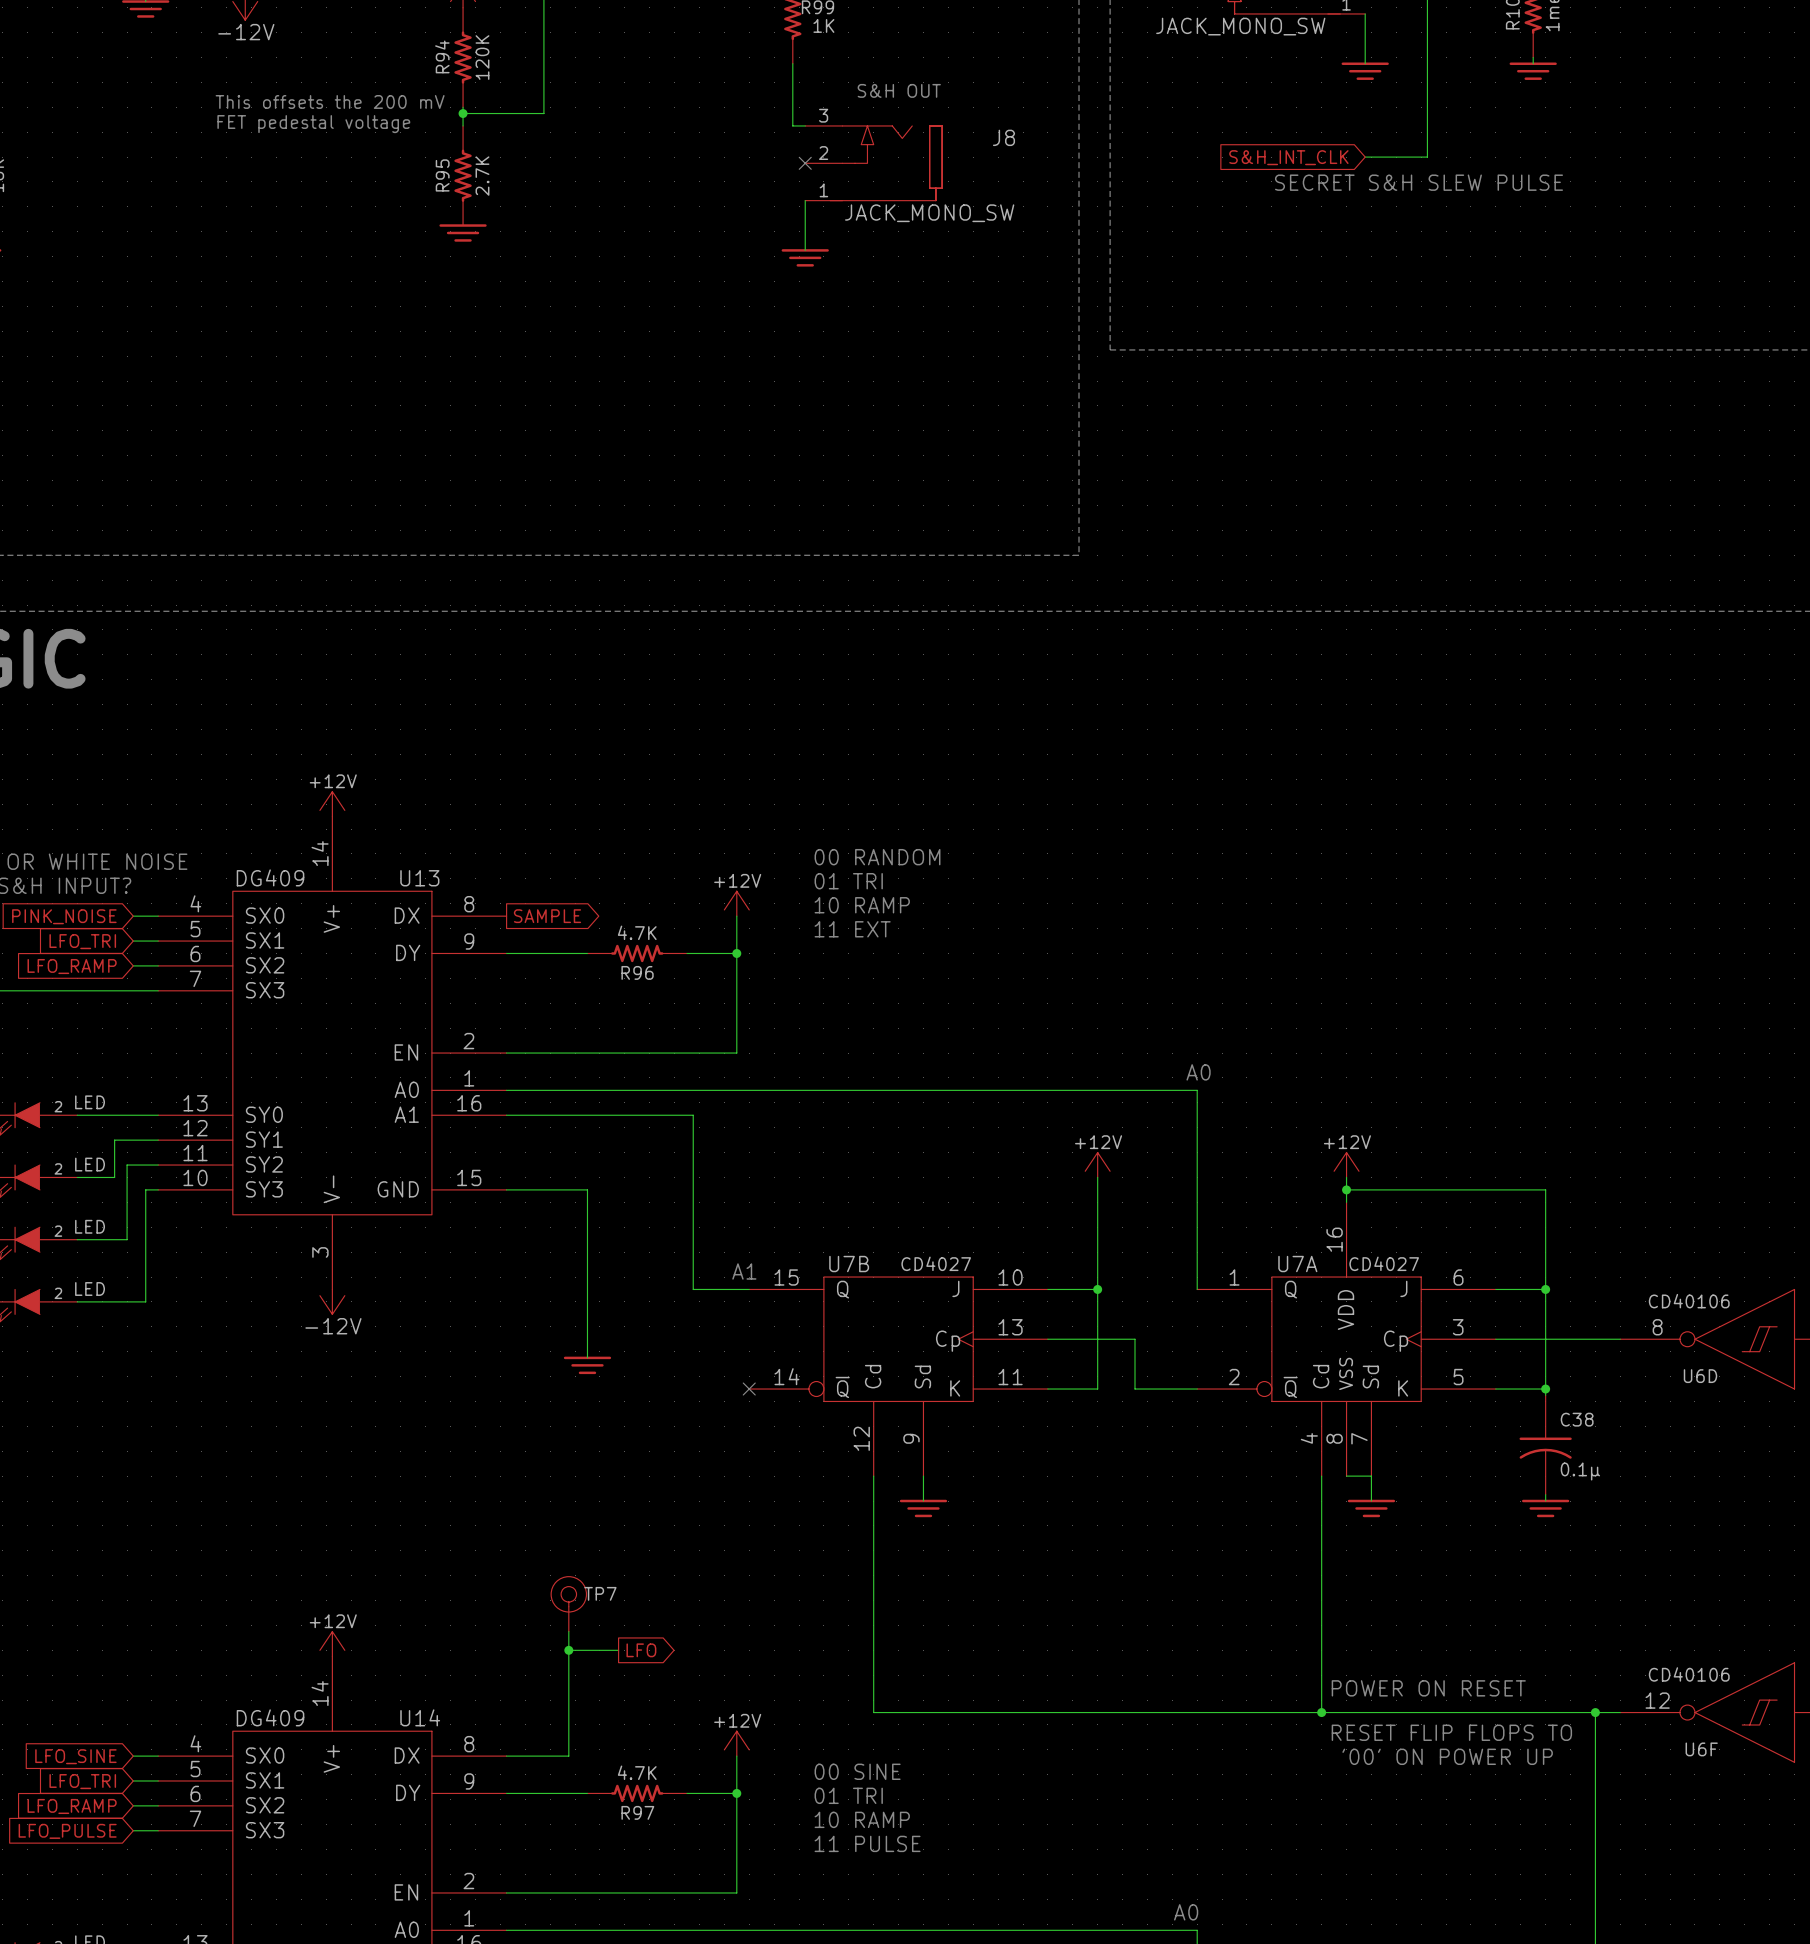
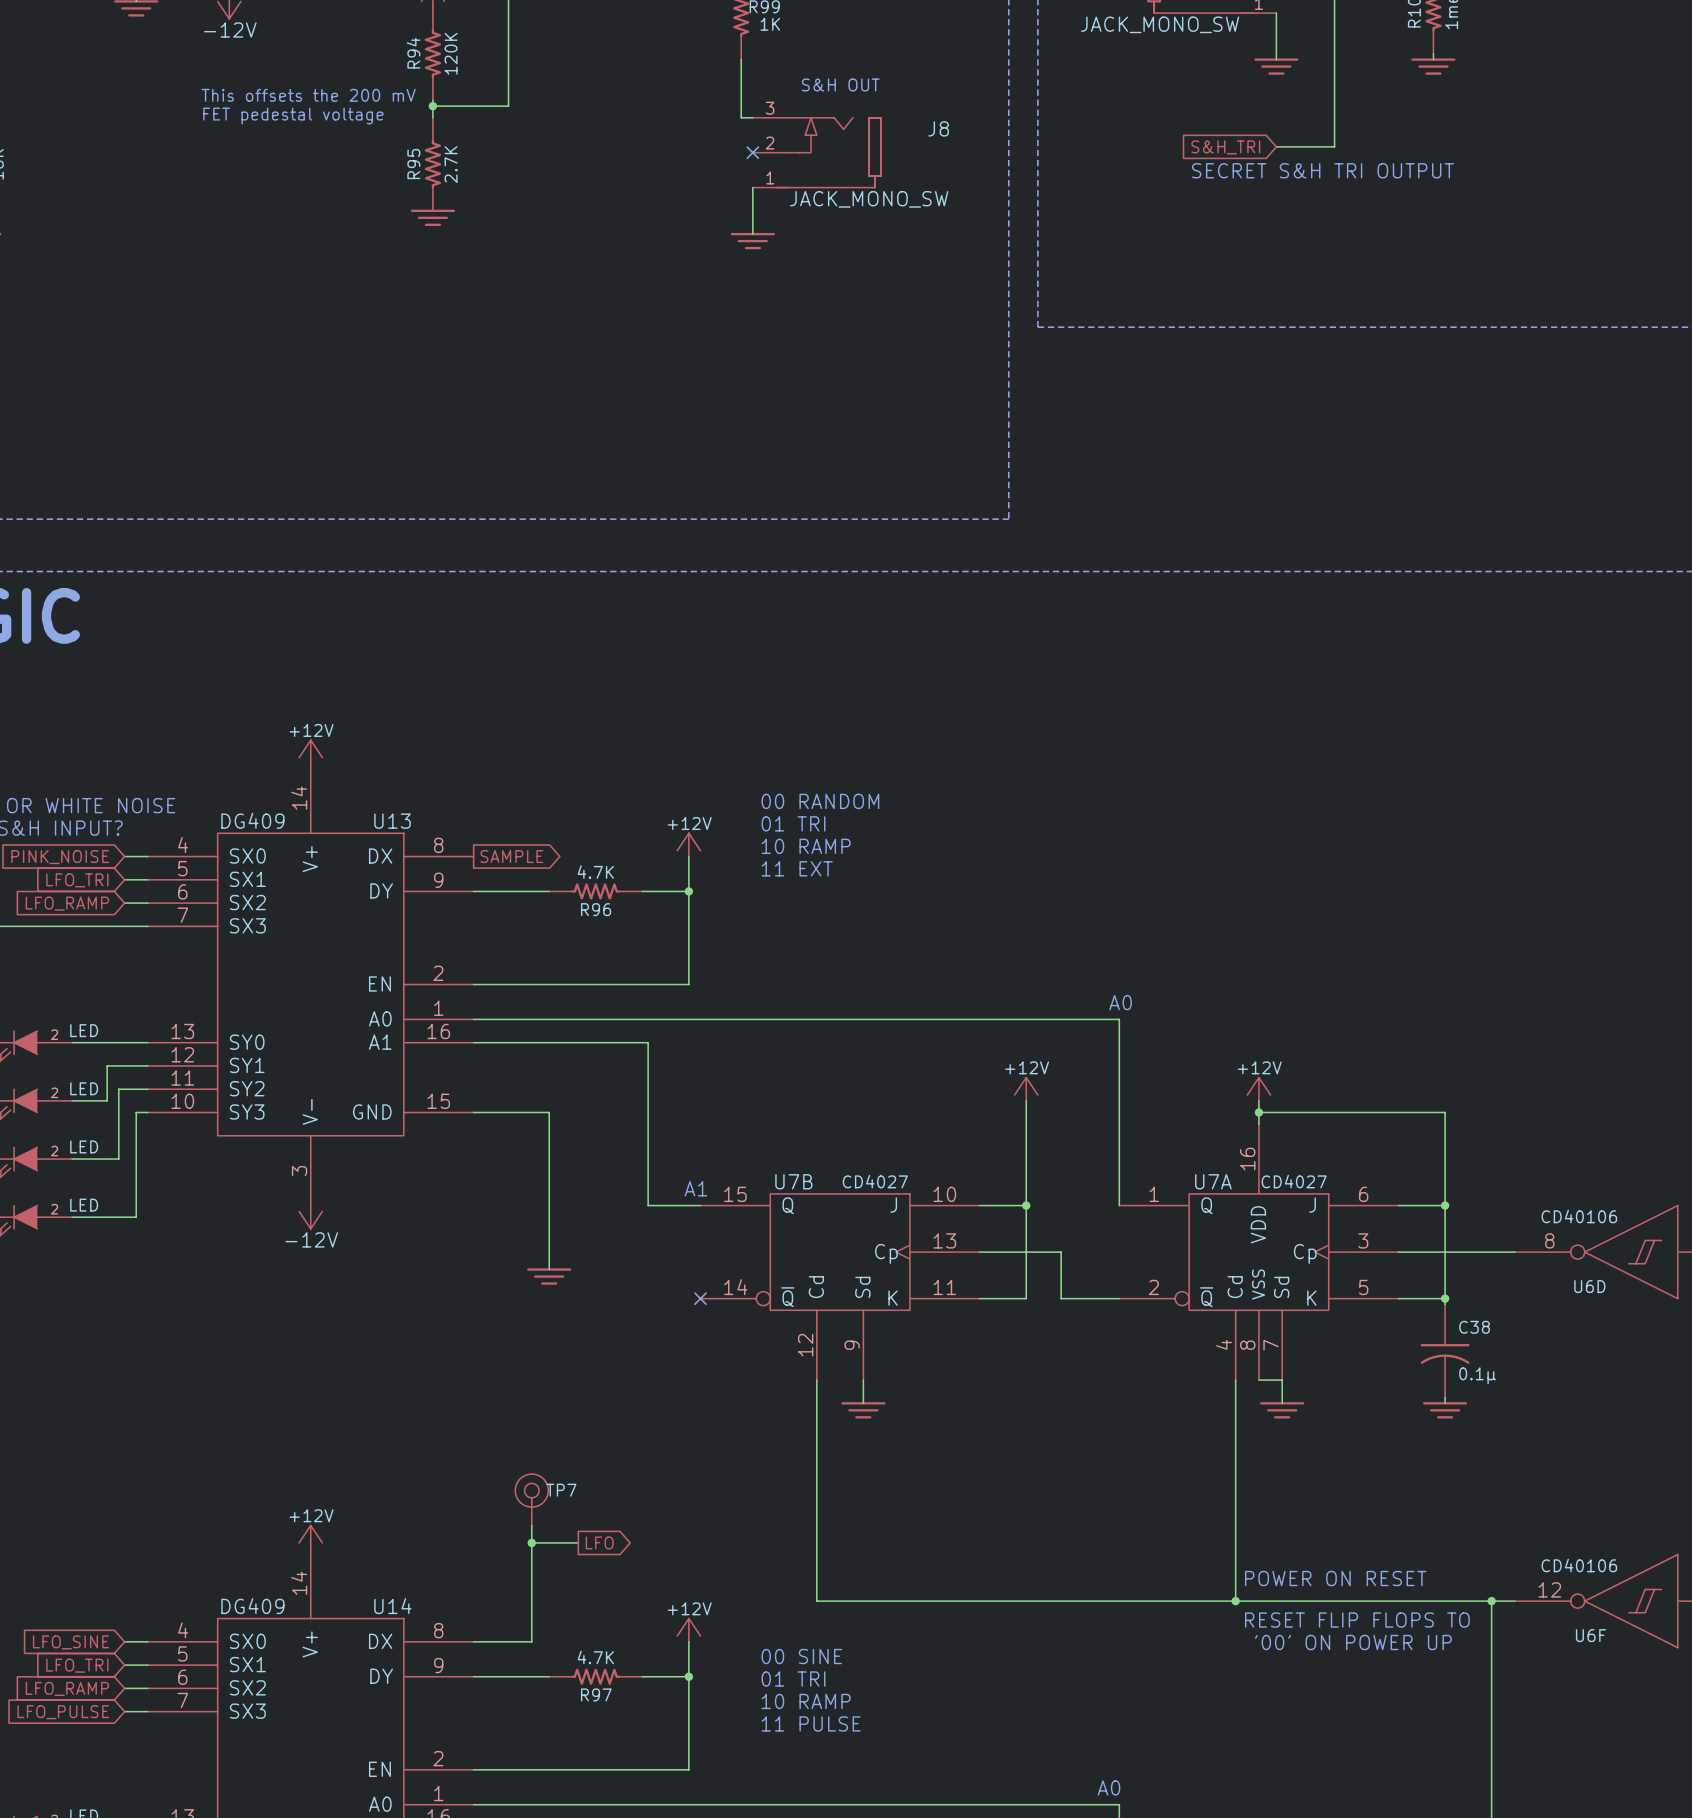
global label: S&H_INT_CLK (1288, 157) -> S&H_TRI (1225, 147)
text: SECRET S&H SLEW PULSE (1418, 182) -> SECRET S&H TRI OUTPUT (1323, 170)

